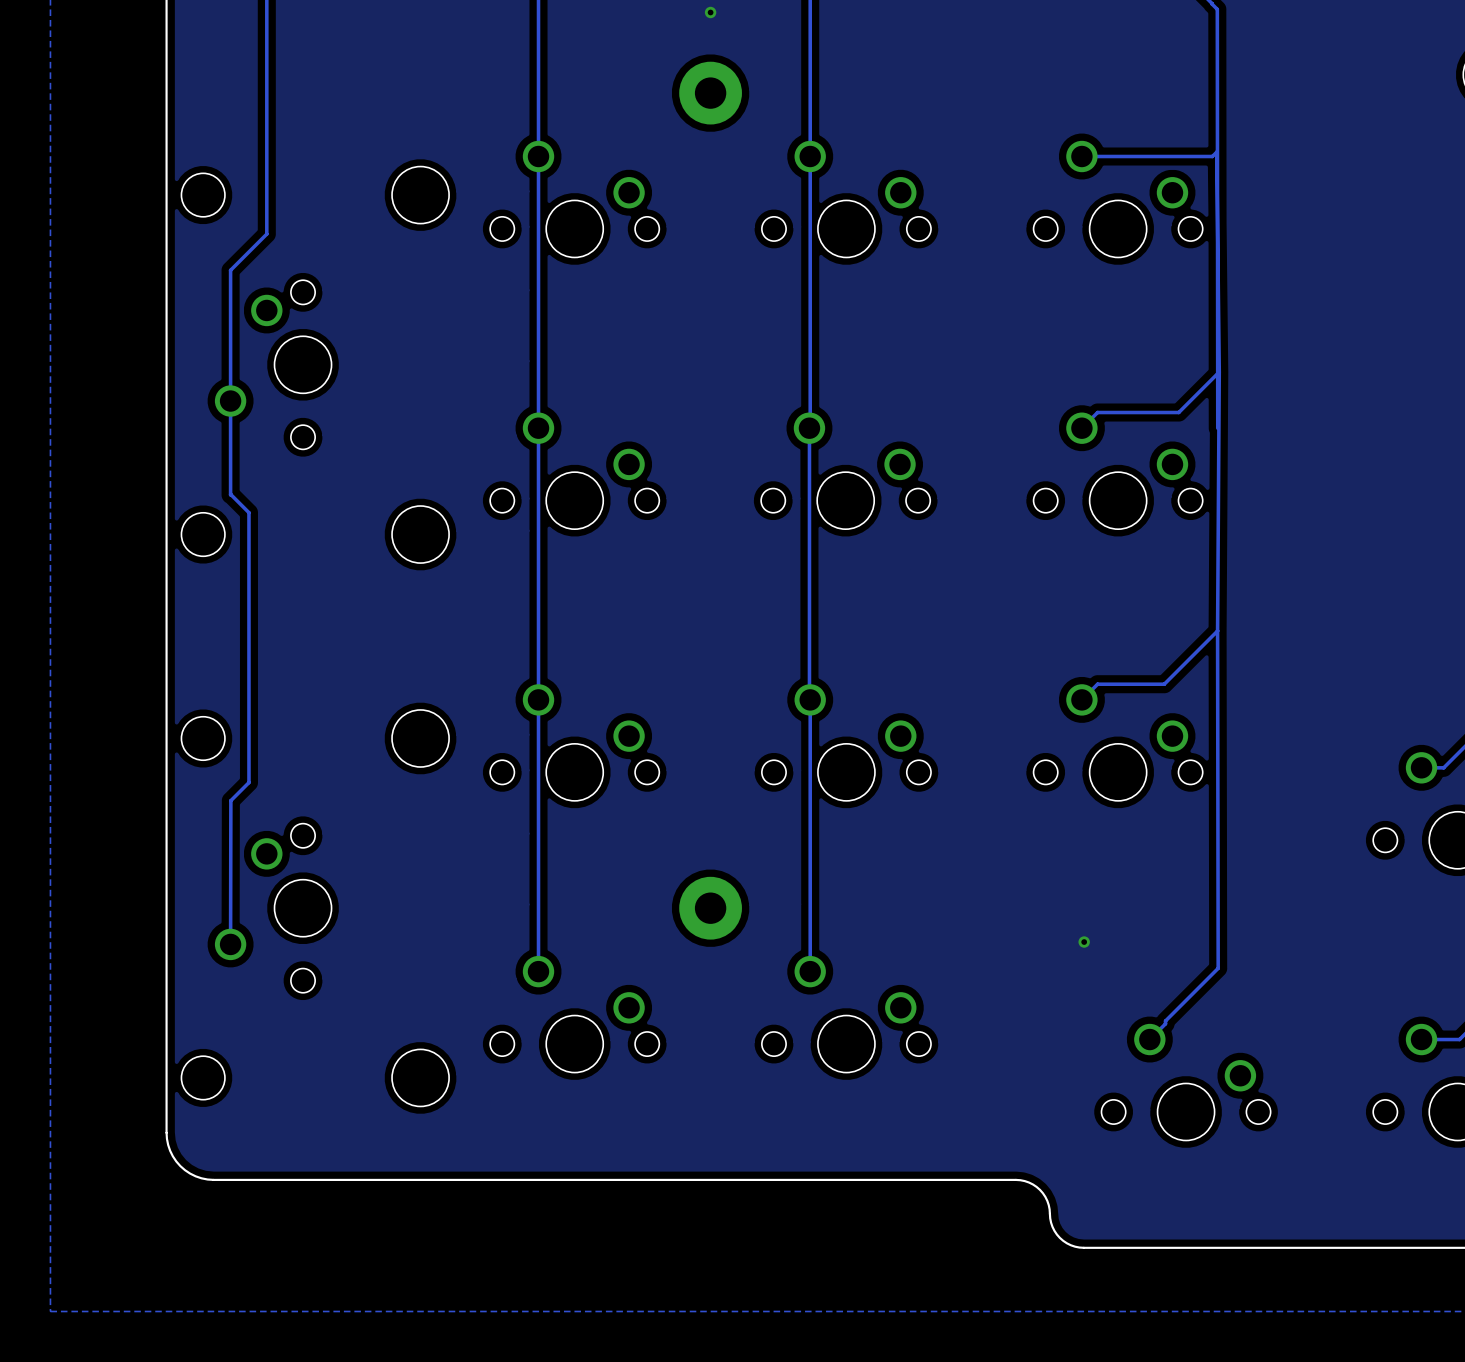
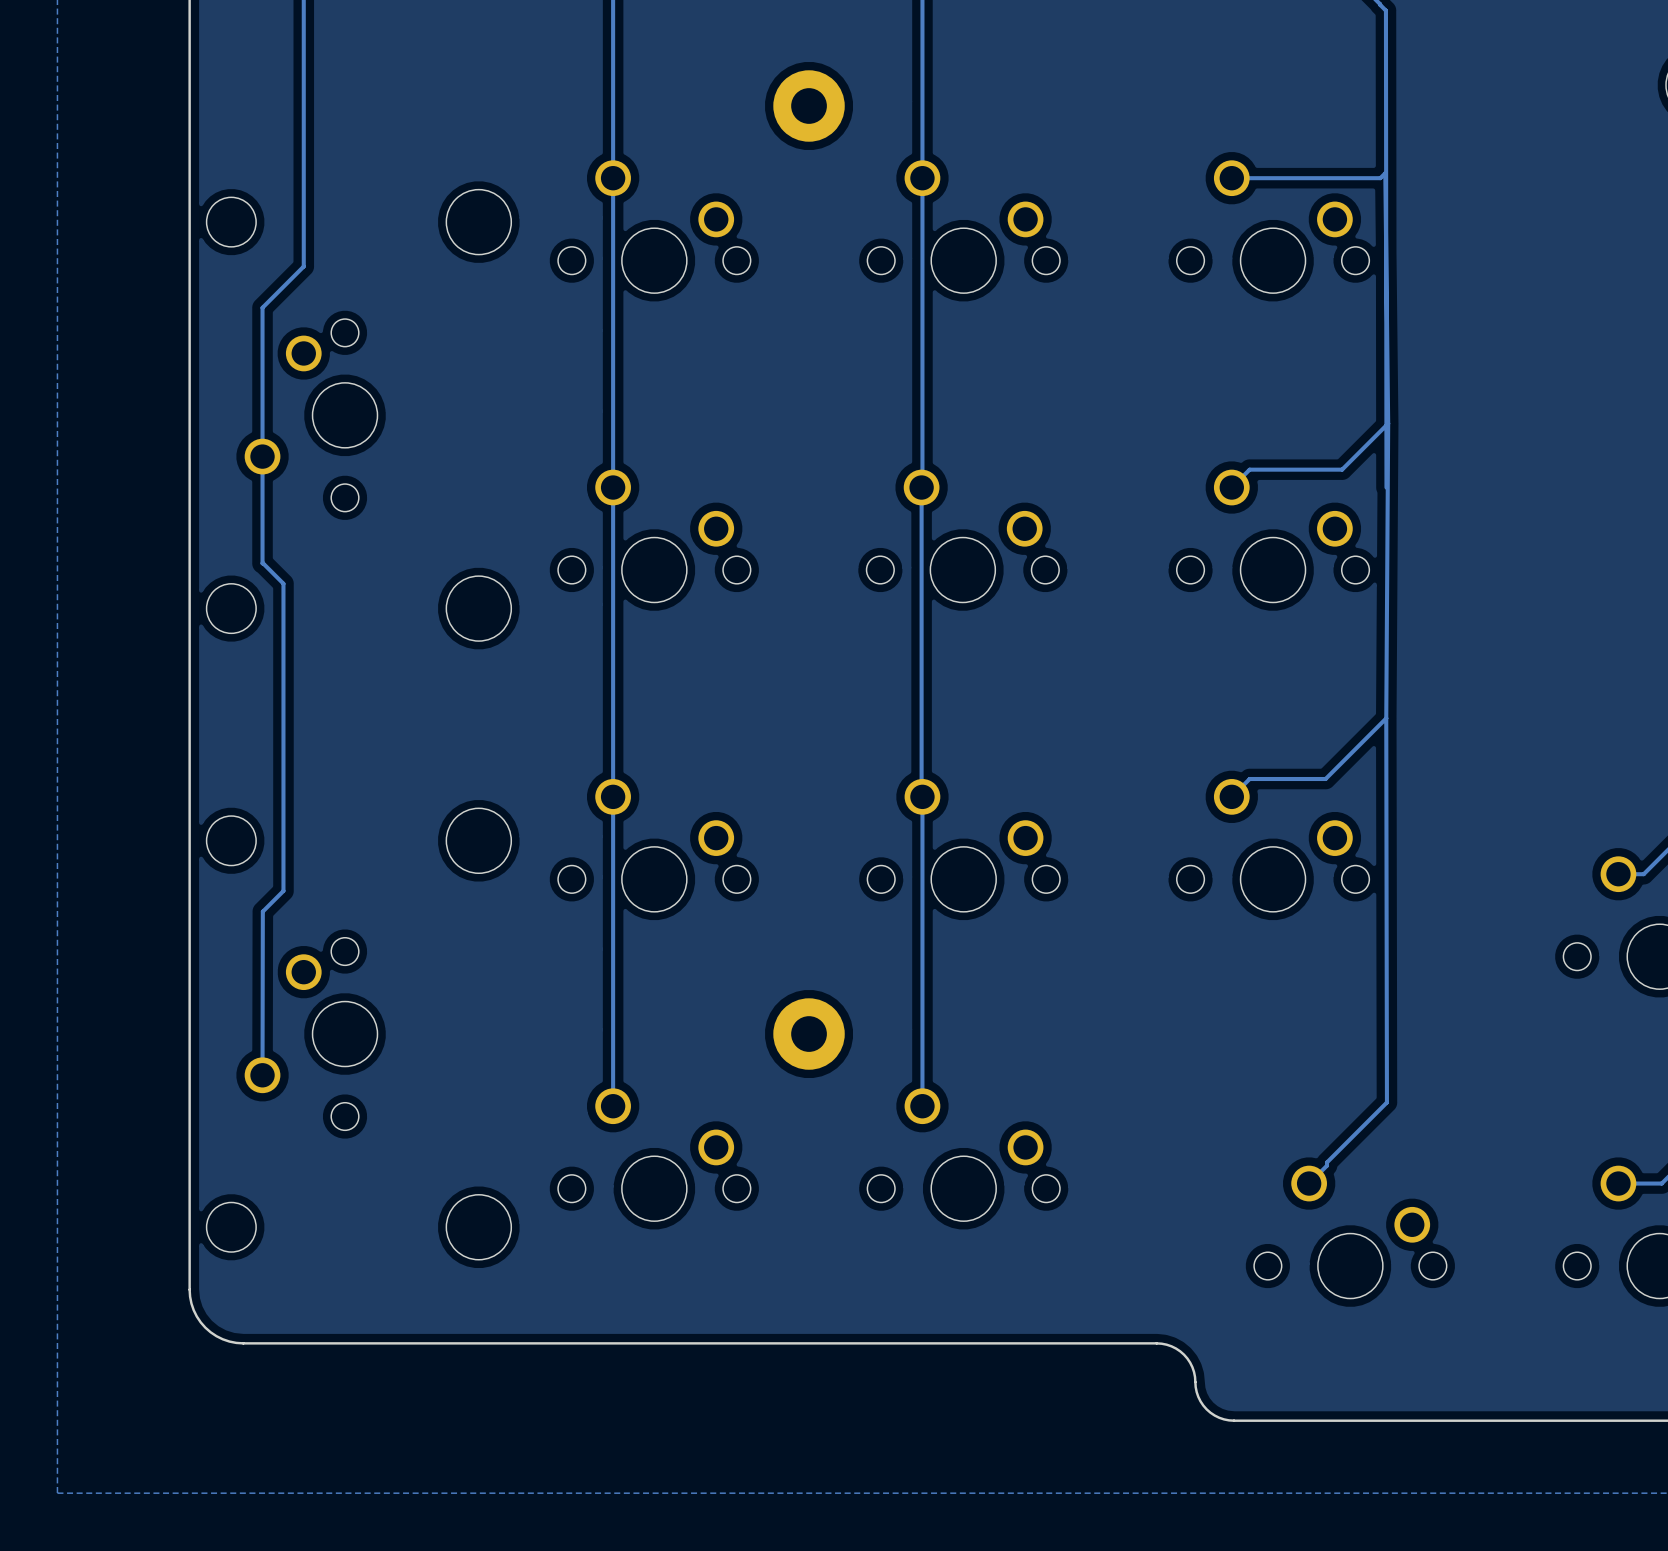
via: (710, 12) -> none
via: (1084, 942) -> none

